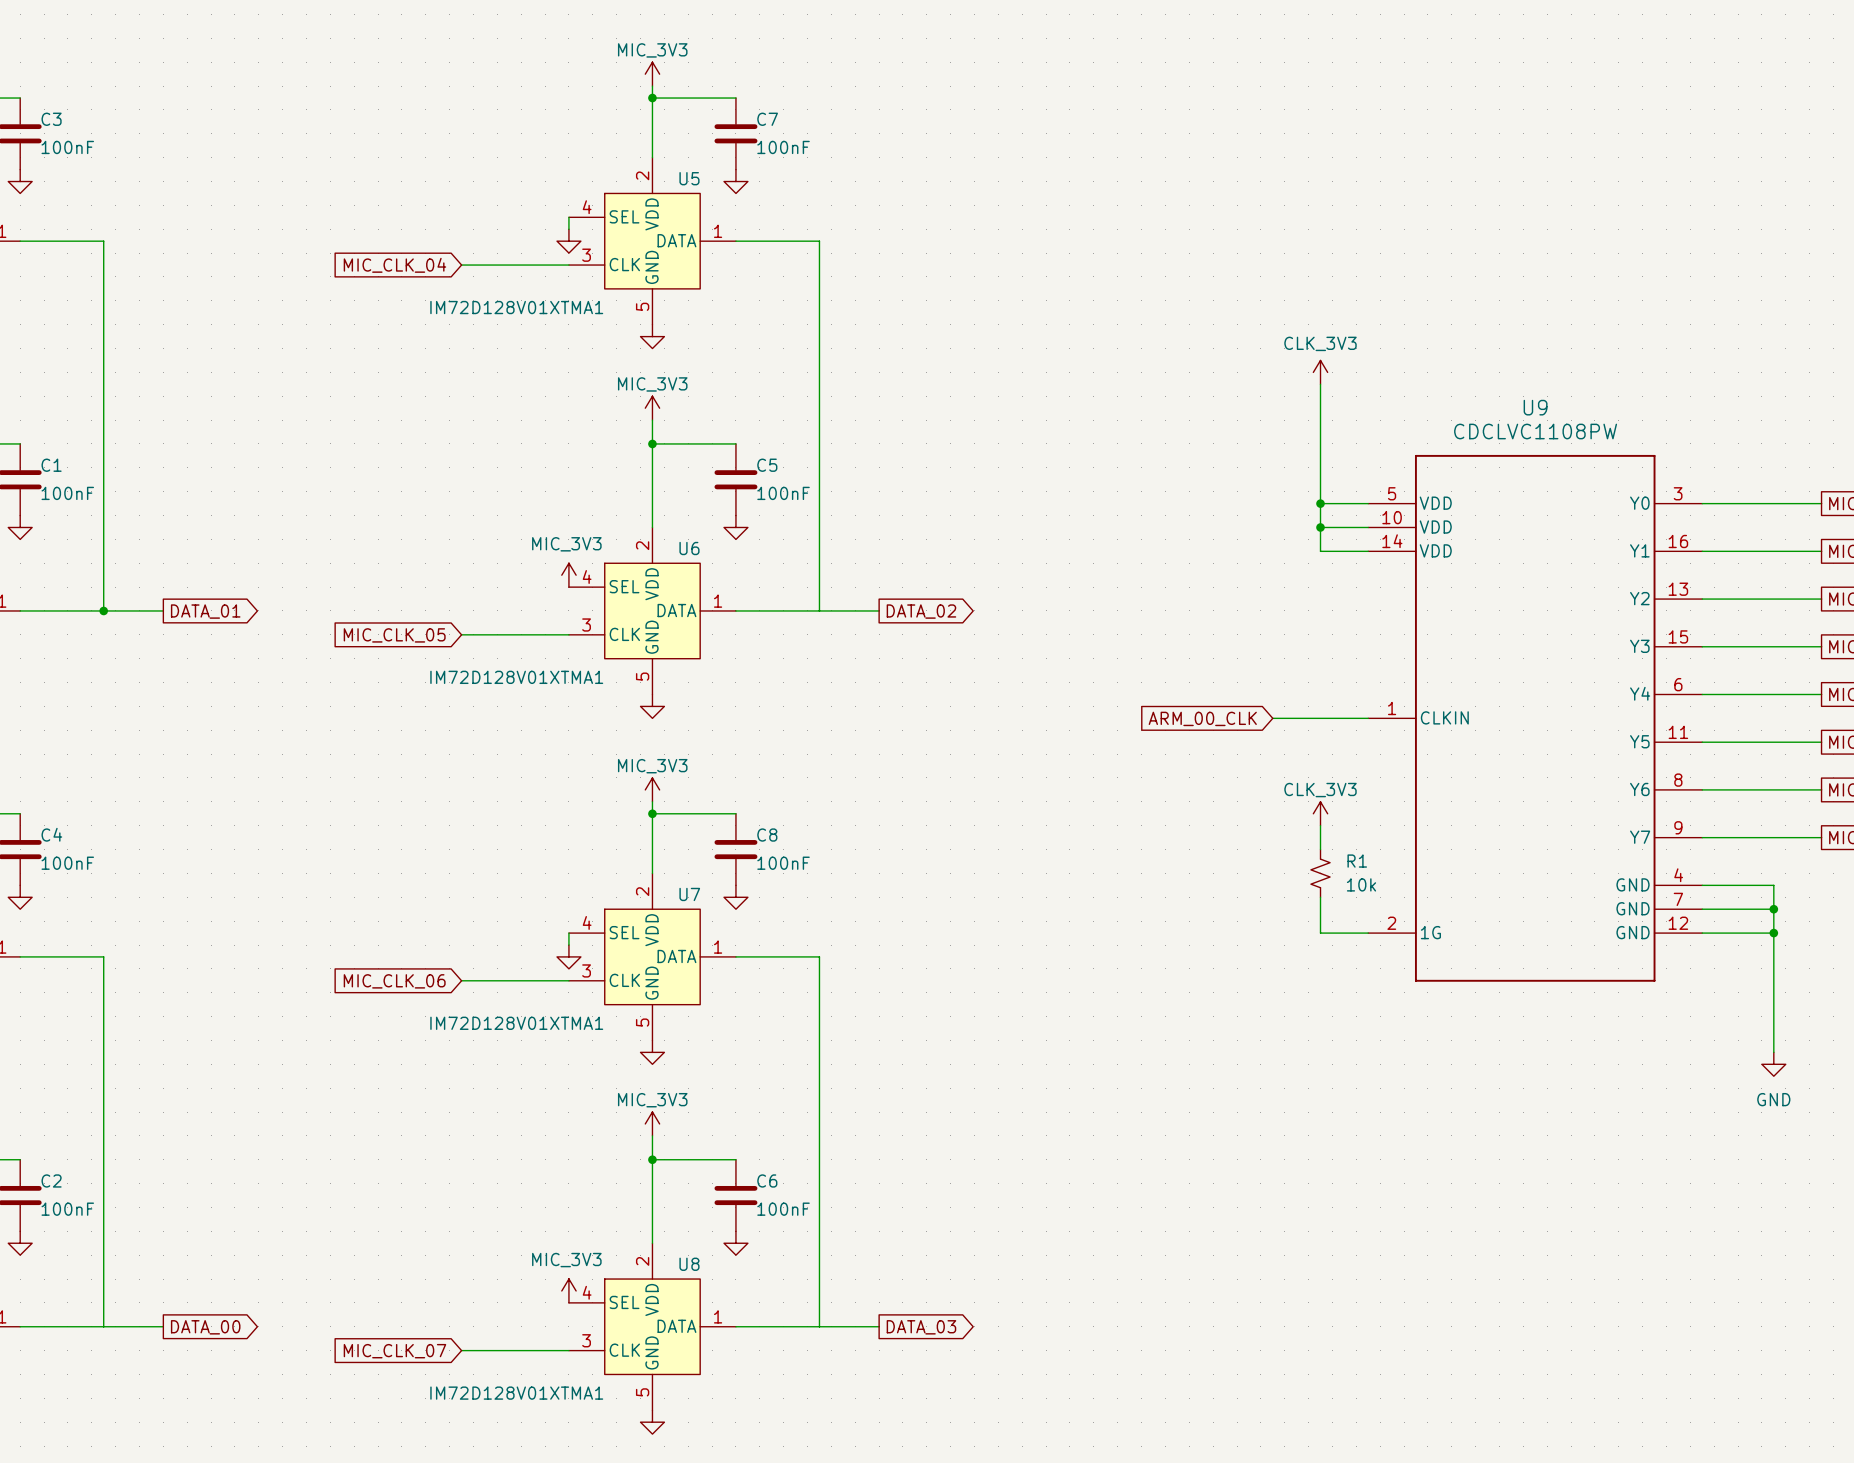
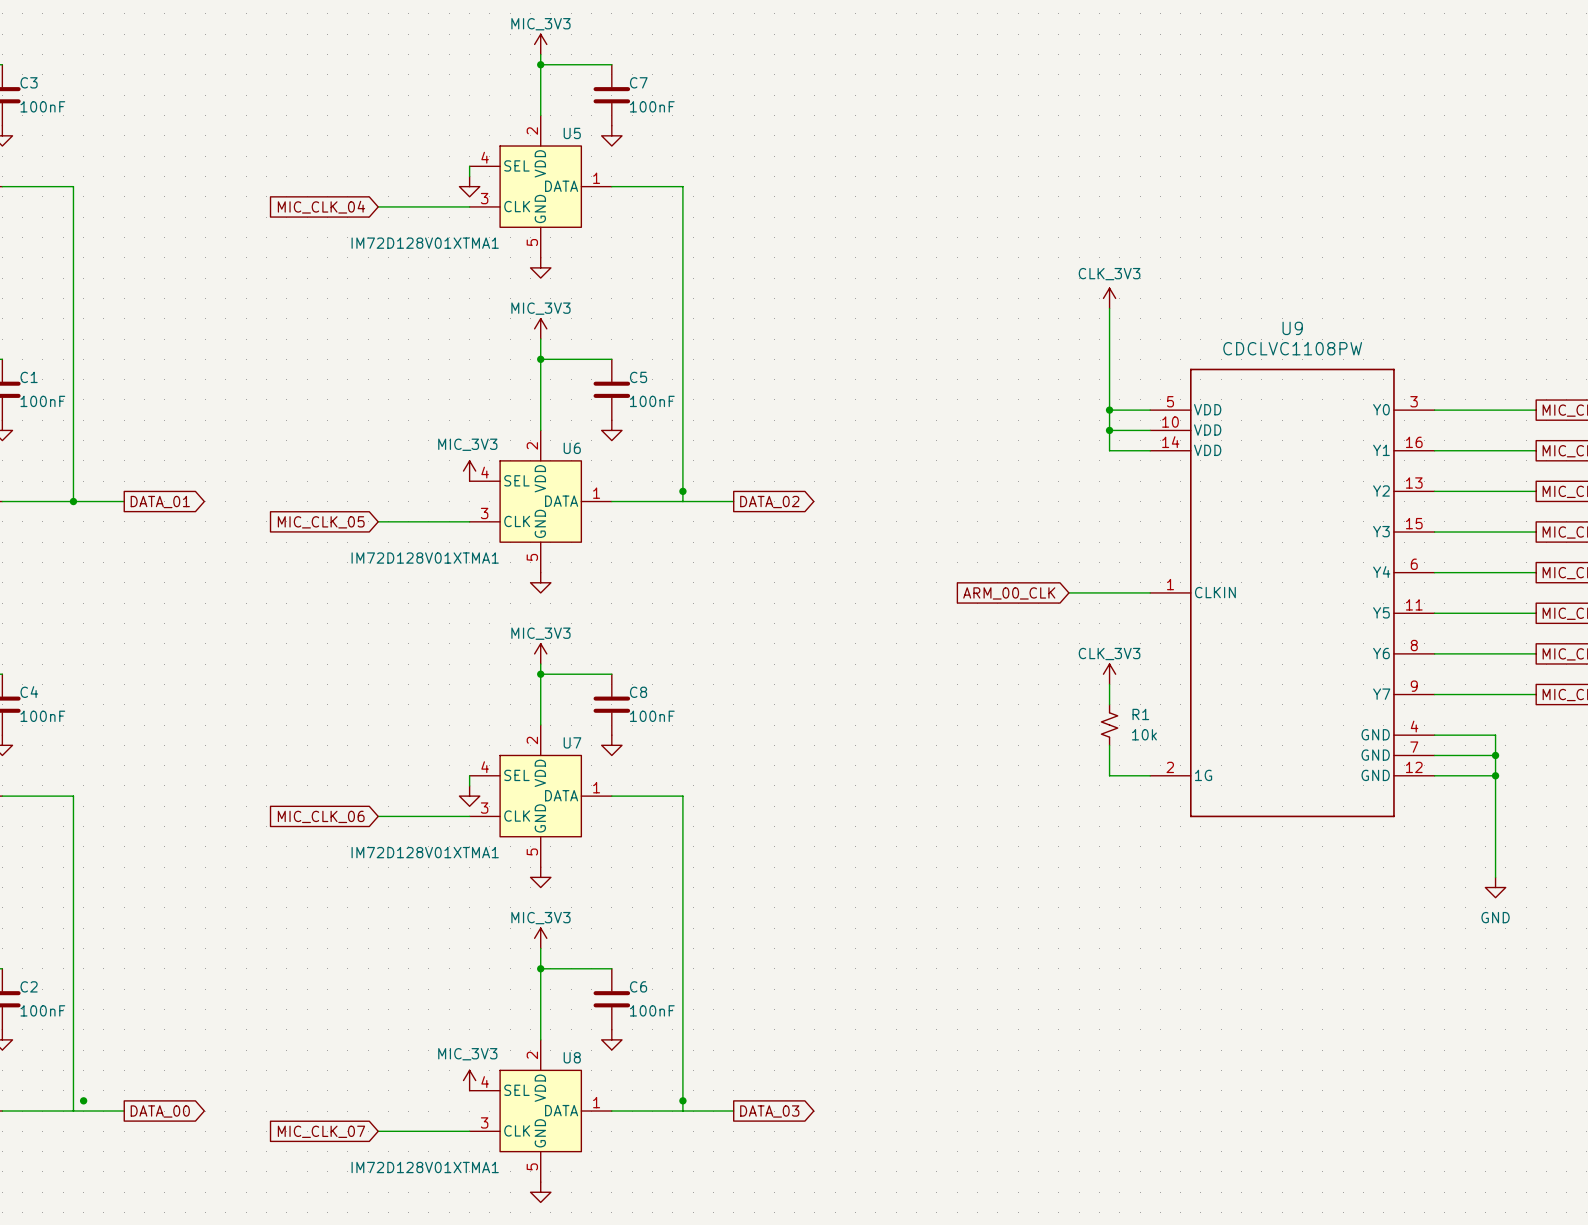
junction: none -> (682, 491)
junction: none -> (83, 1100)
junction: none -> (682, 1100)

